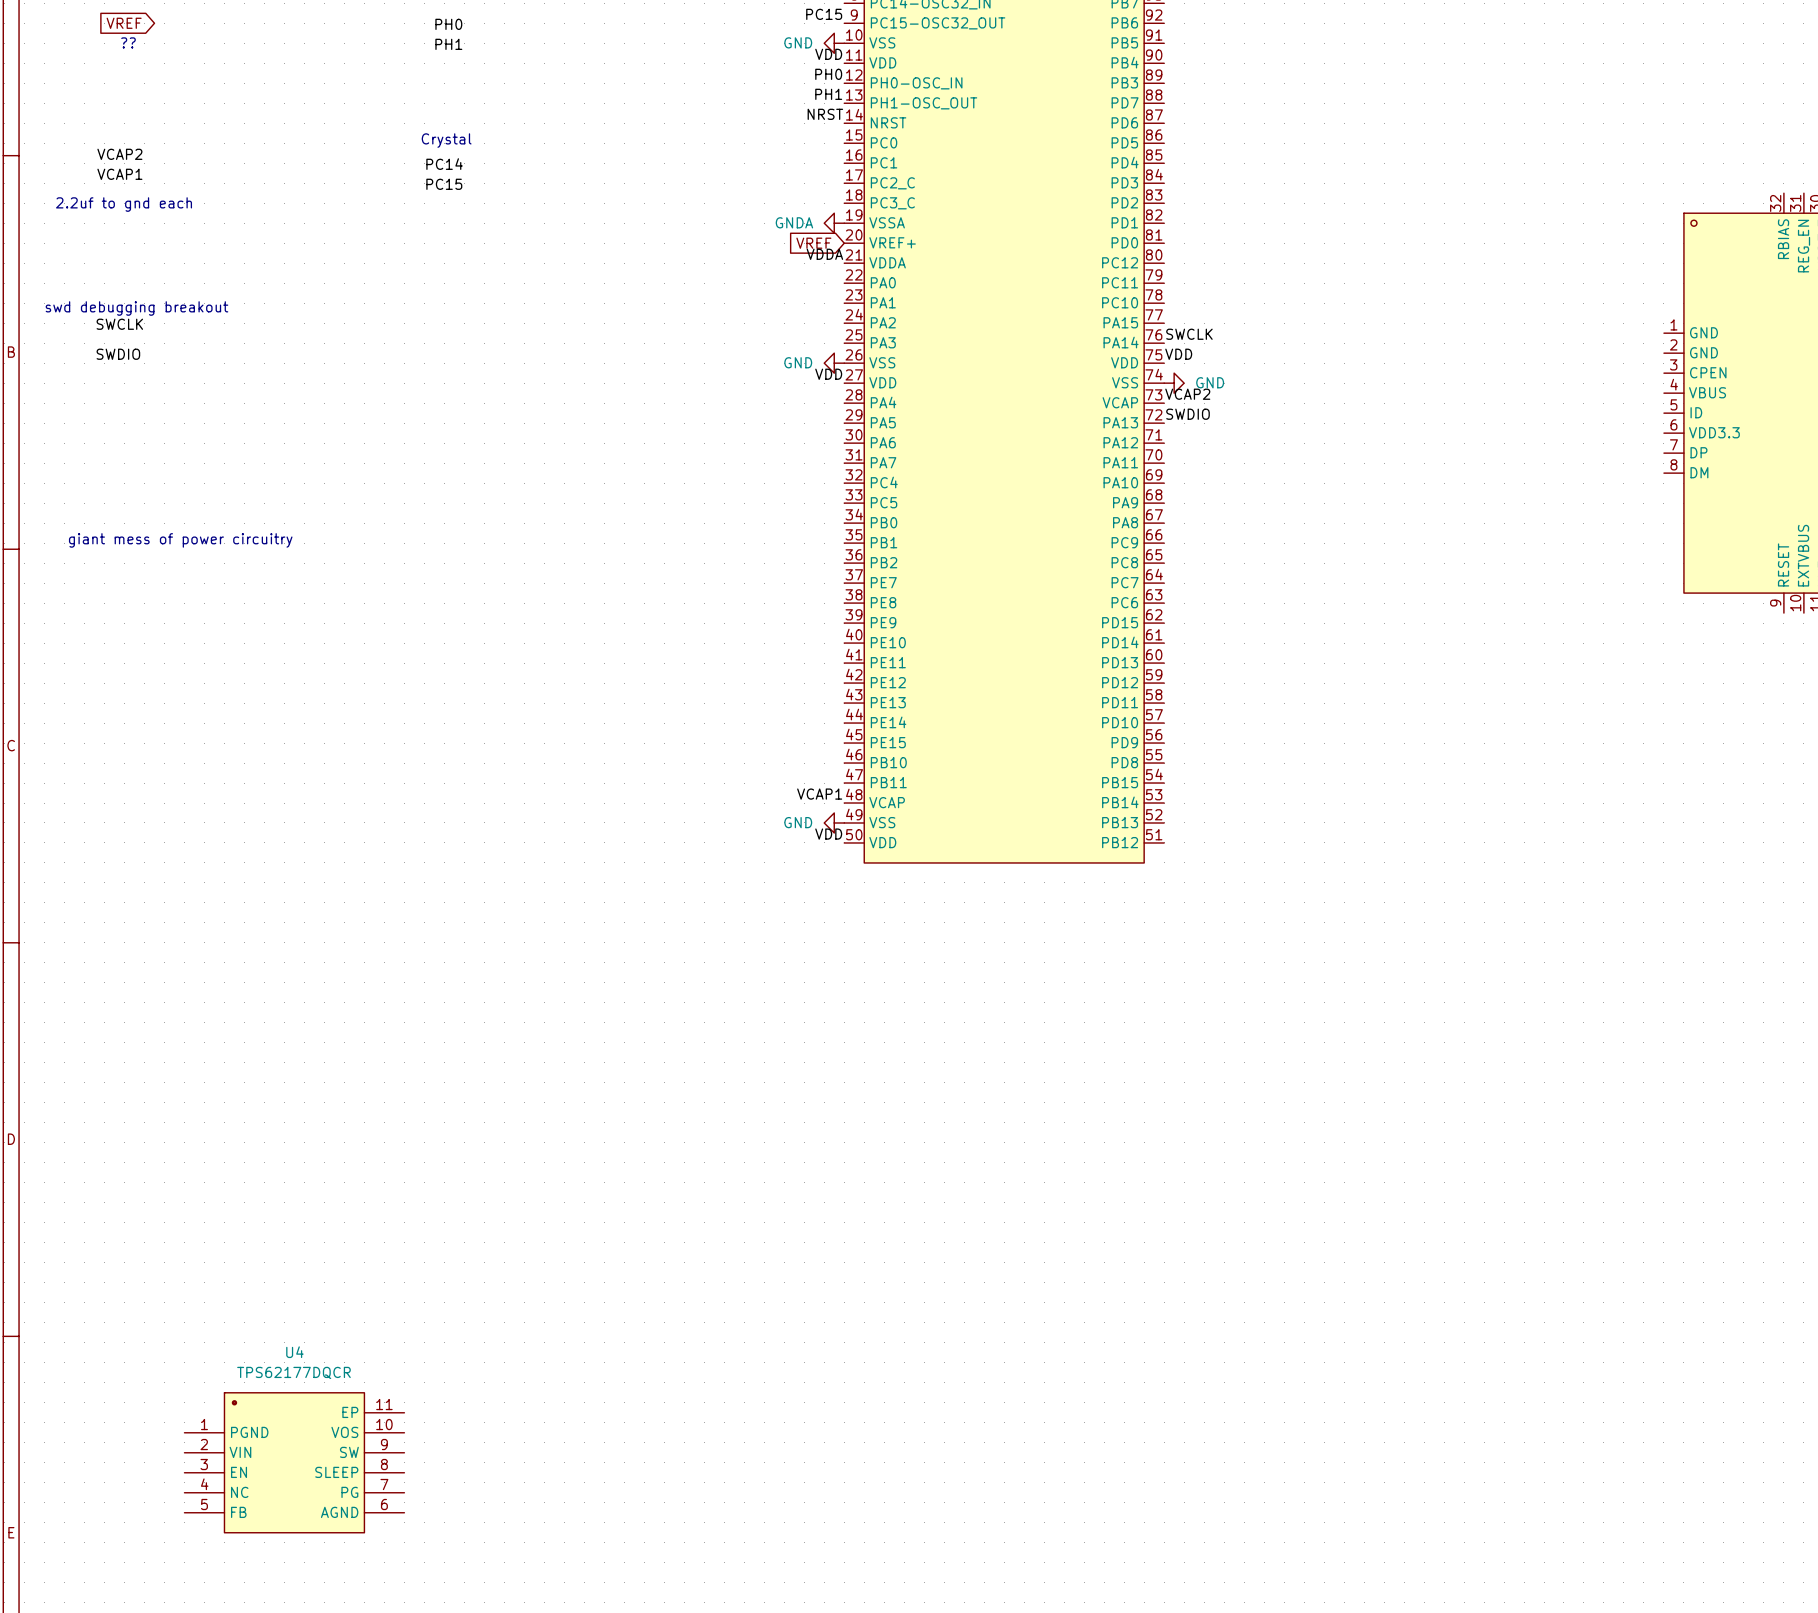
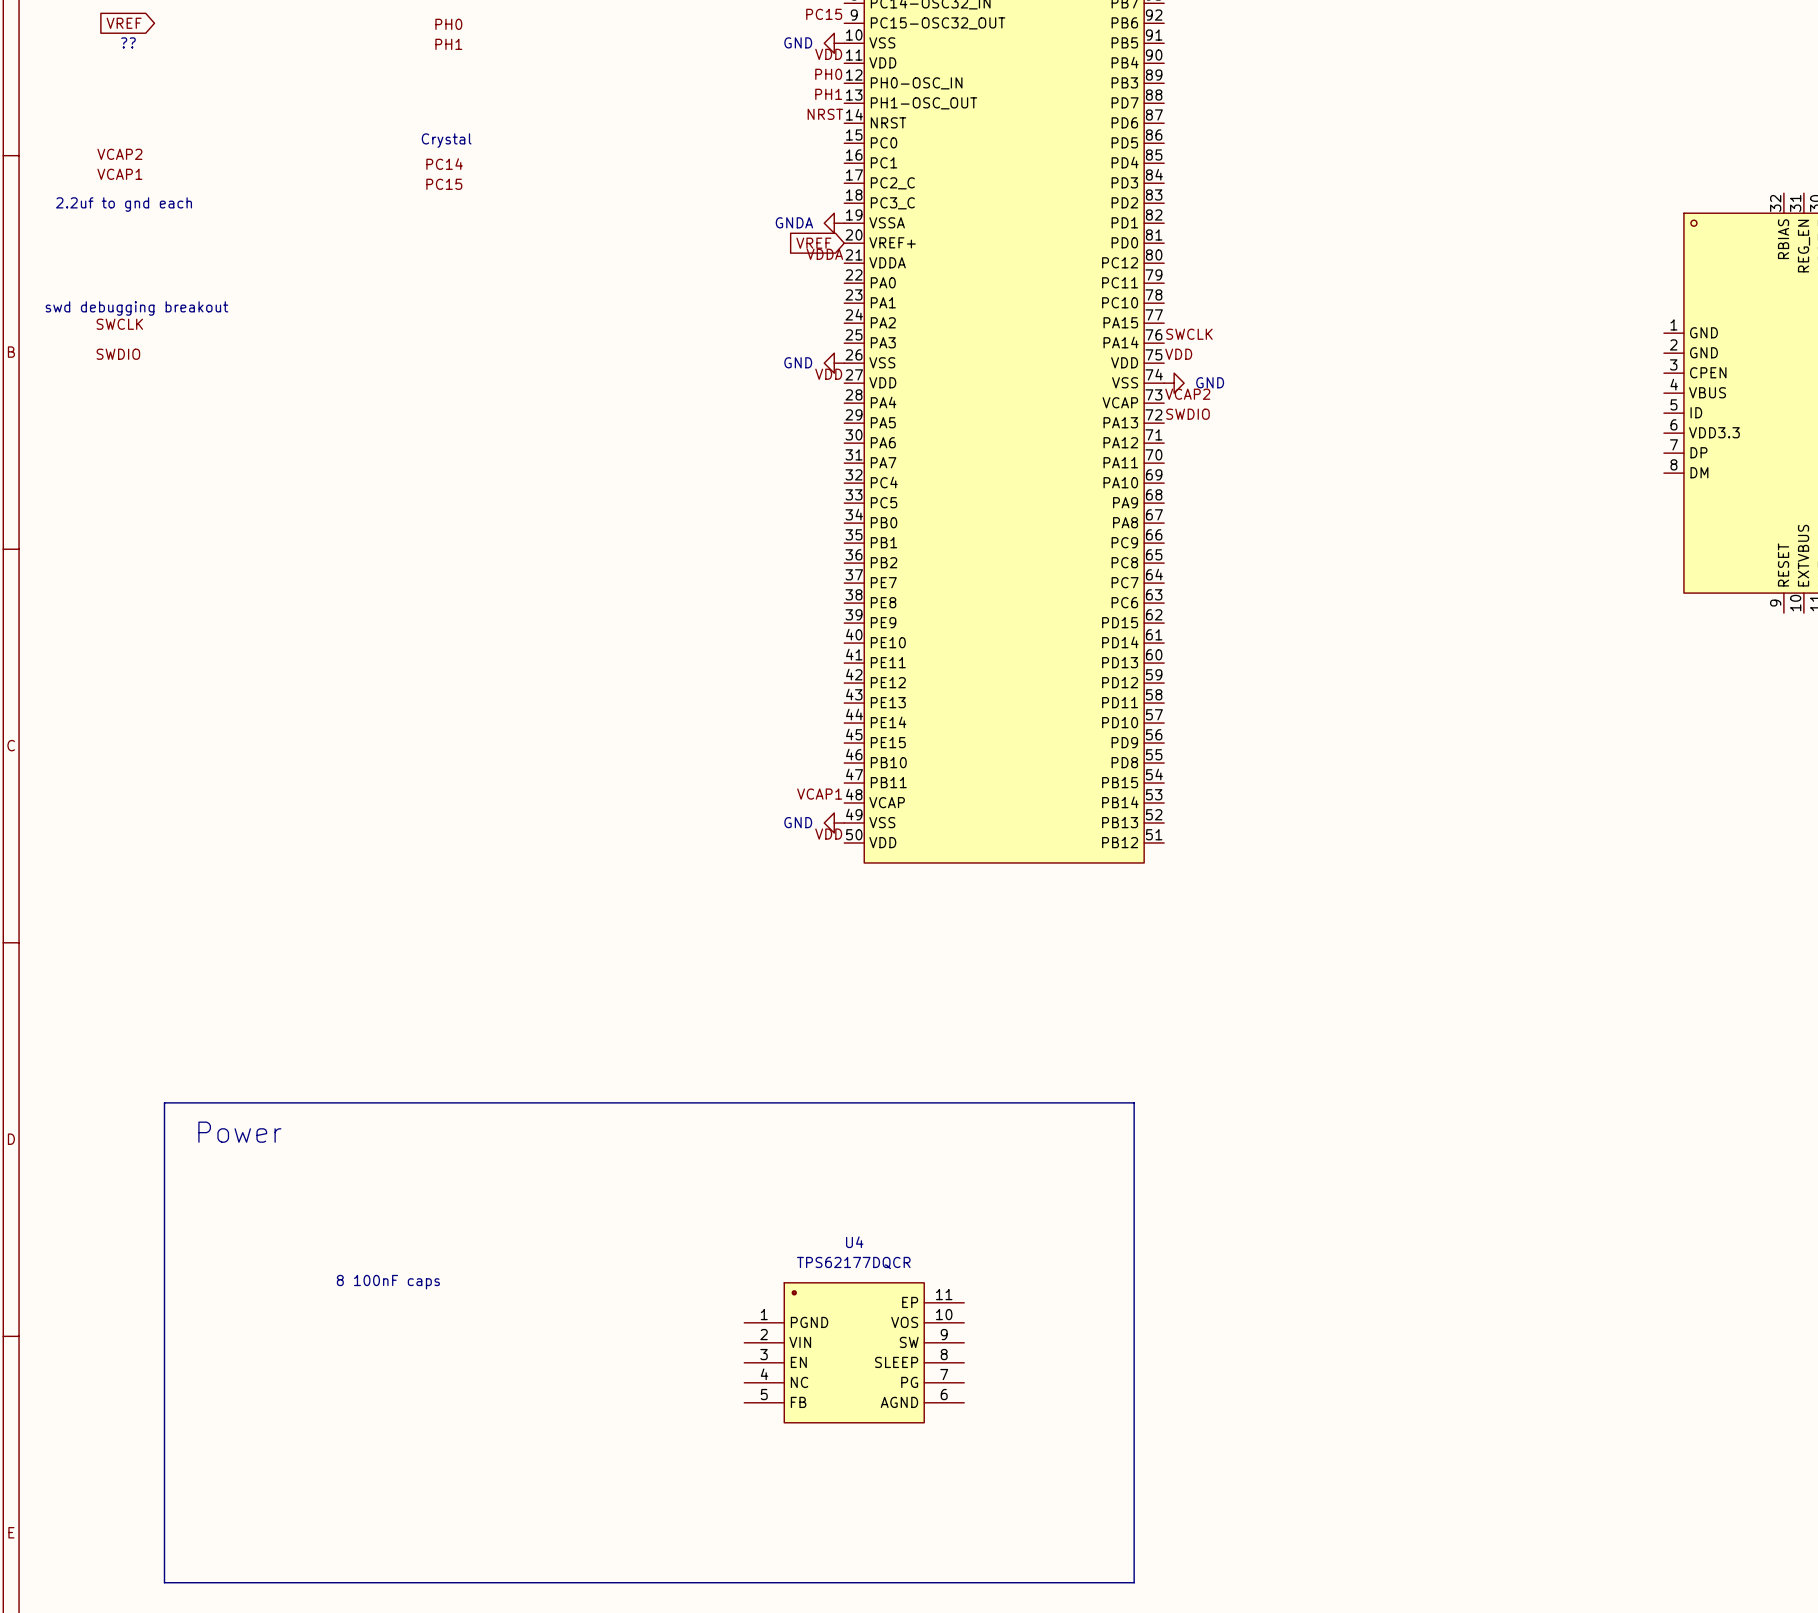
text: giant mess of power circuitry (180, 540) -> none
line: none -> (164, 1102) (1134, 1102) (1134, 1582) (164, 1582) (164, 1102)
text: none -> Power (239, 1132)
text: none -> 8 100nF caps (388, 1282)
U4 position: (294, 1462) -> (854, 1352)

